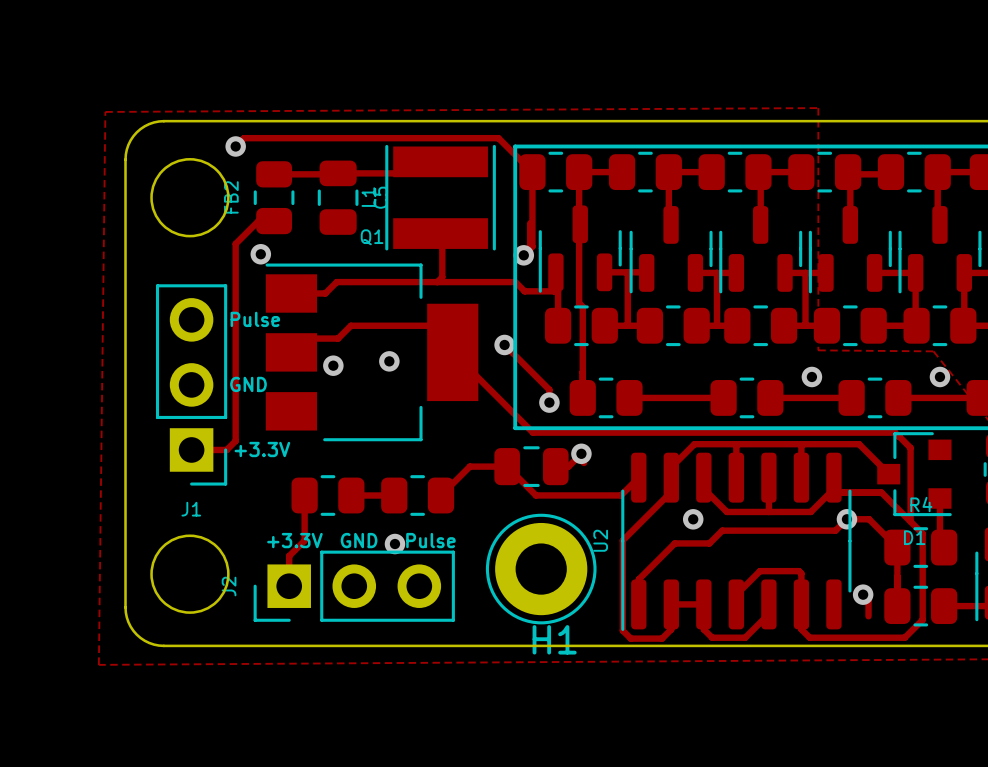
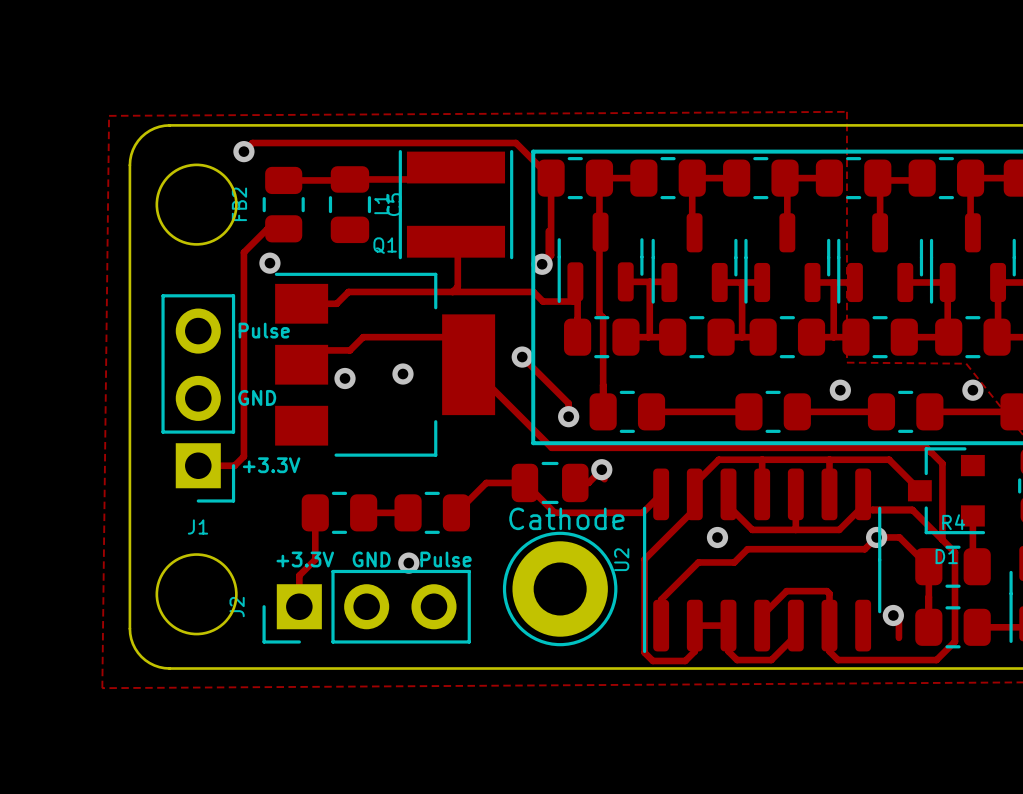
H1 value: none -> Cathode (566, 518)
H1 name: H1 (554, 639) -> none

